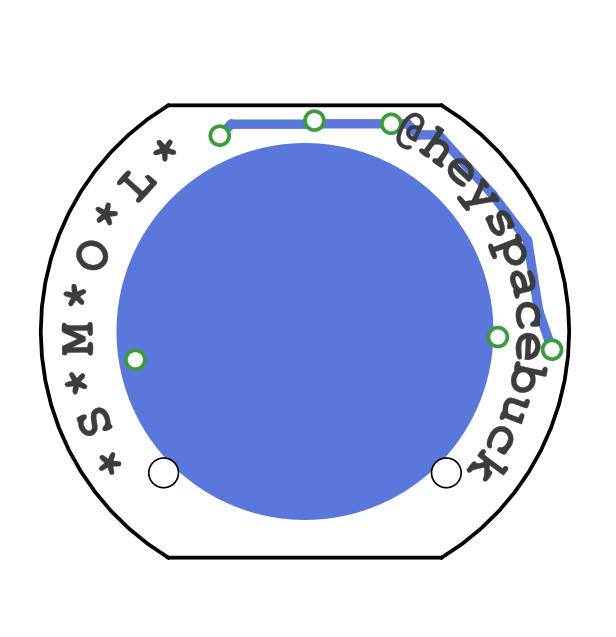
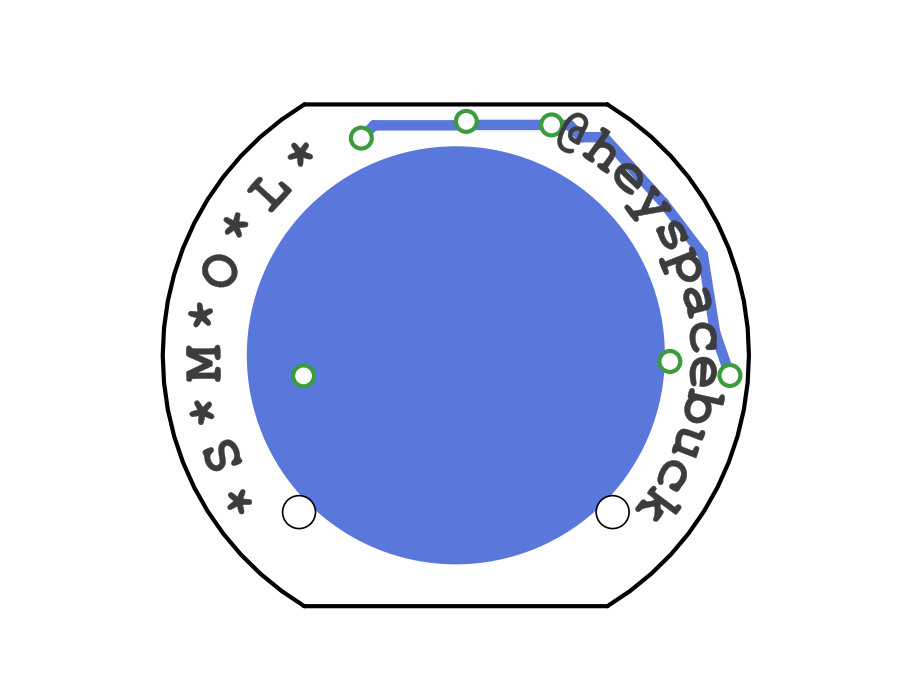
via position: (135, 359) -> (303, 375)

